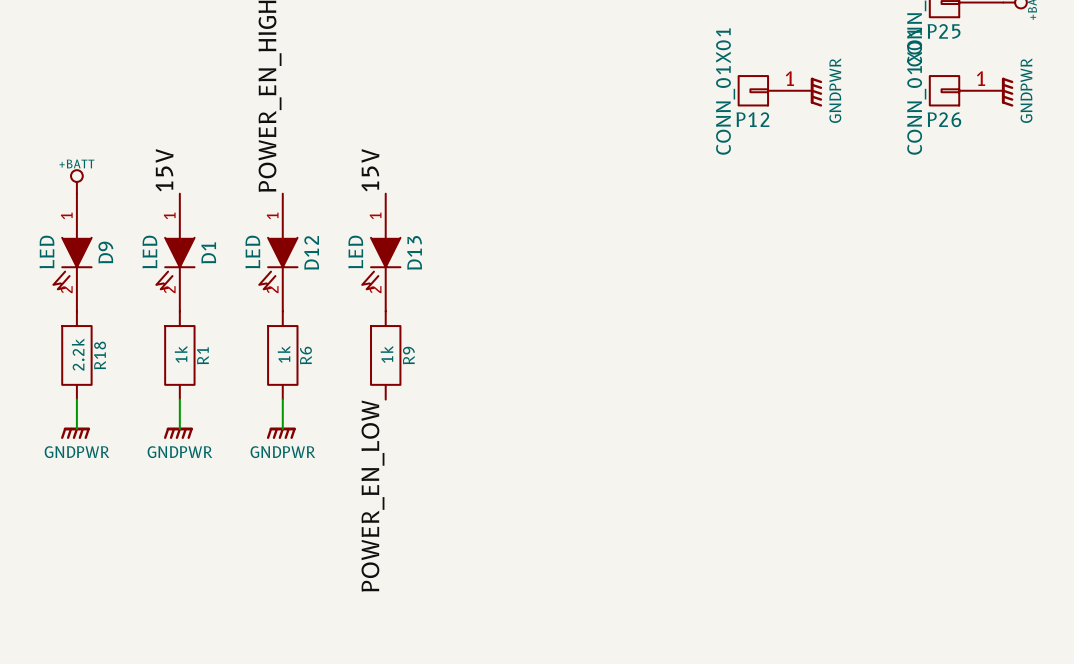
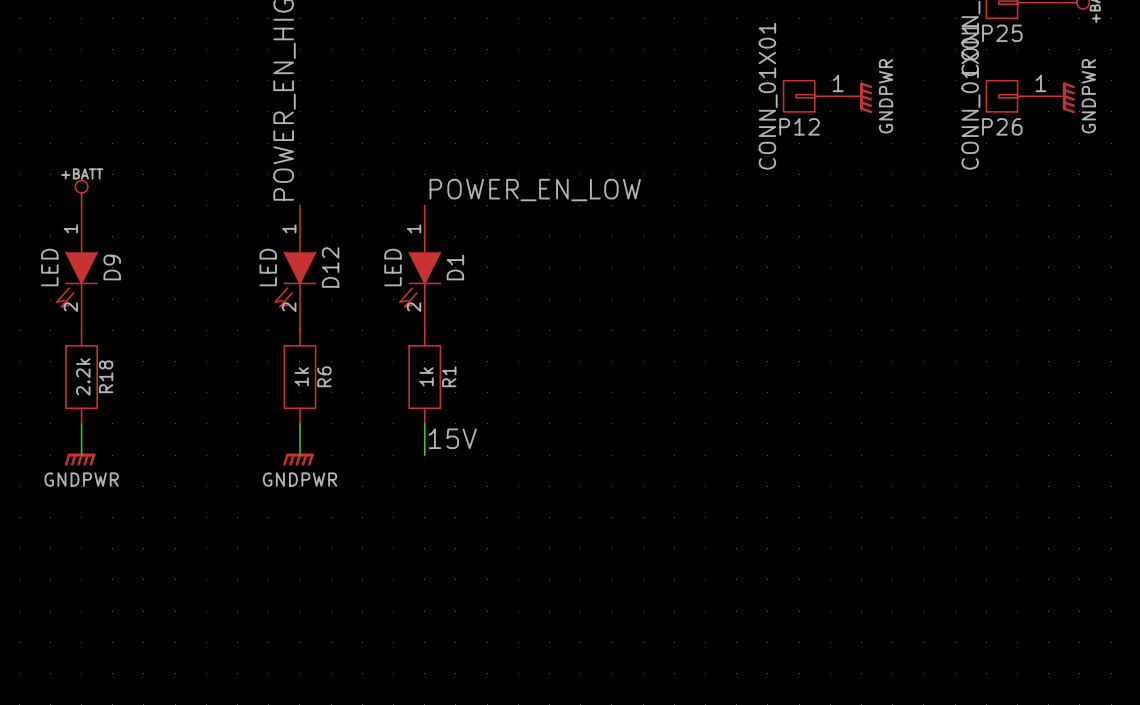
label: 15V (164, 170) -> none
label: 15V (370, 170) -> none
D1 position: (175, 252) -> (420, 267)
D13: LED (381, 252) -> none
R1 position: (179, 355) -> (424, 377)
R9: 1k (385, 355) -> none
wire: (179, 399) (179, 428) -> (424, 423) (424, 455)
label: none -> 15V (452, 438)
power symbol: GNDPWR (178, 433) -> none
label rotation: 0° (372, 496) -> 90° clockwise (535, 190)
label position: POWER_EN_LOW (372, 496) -> POWER_EN_LOW (535, 190)

